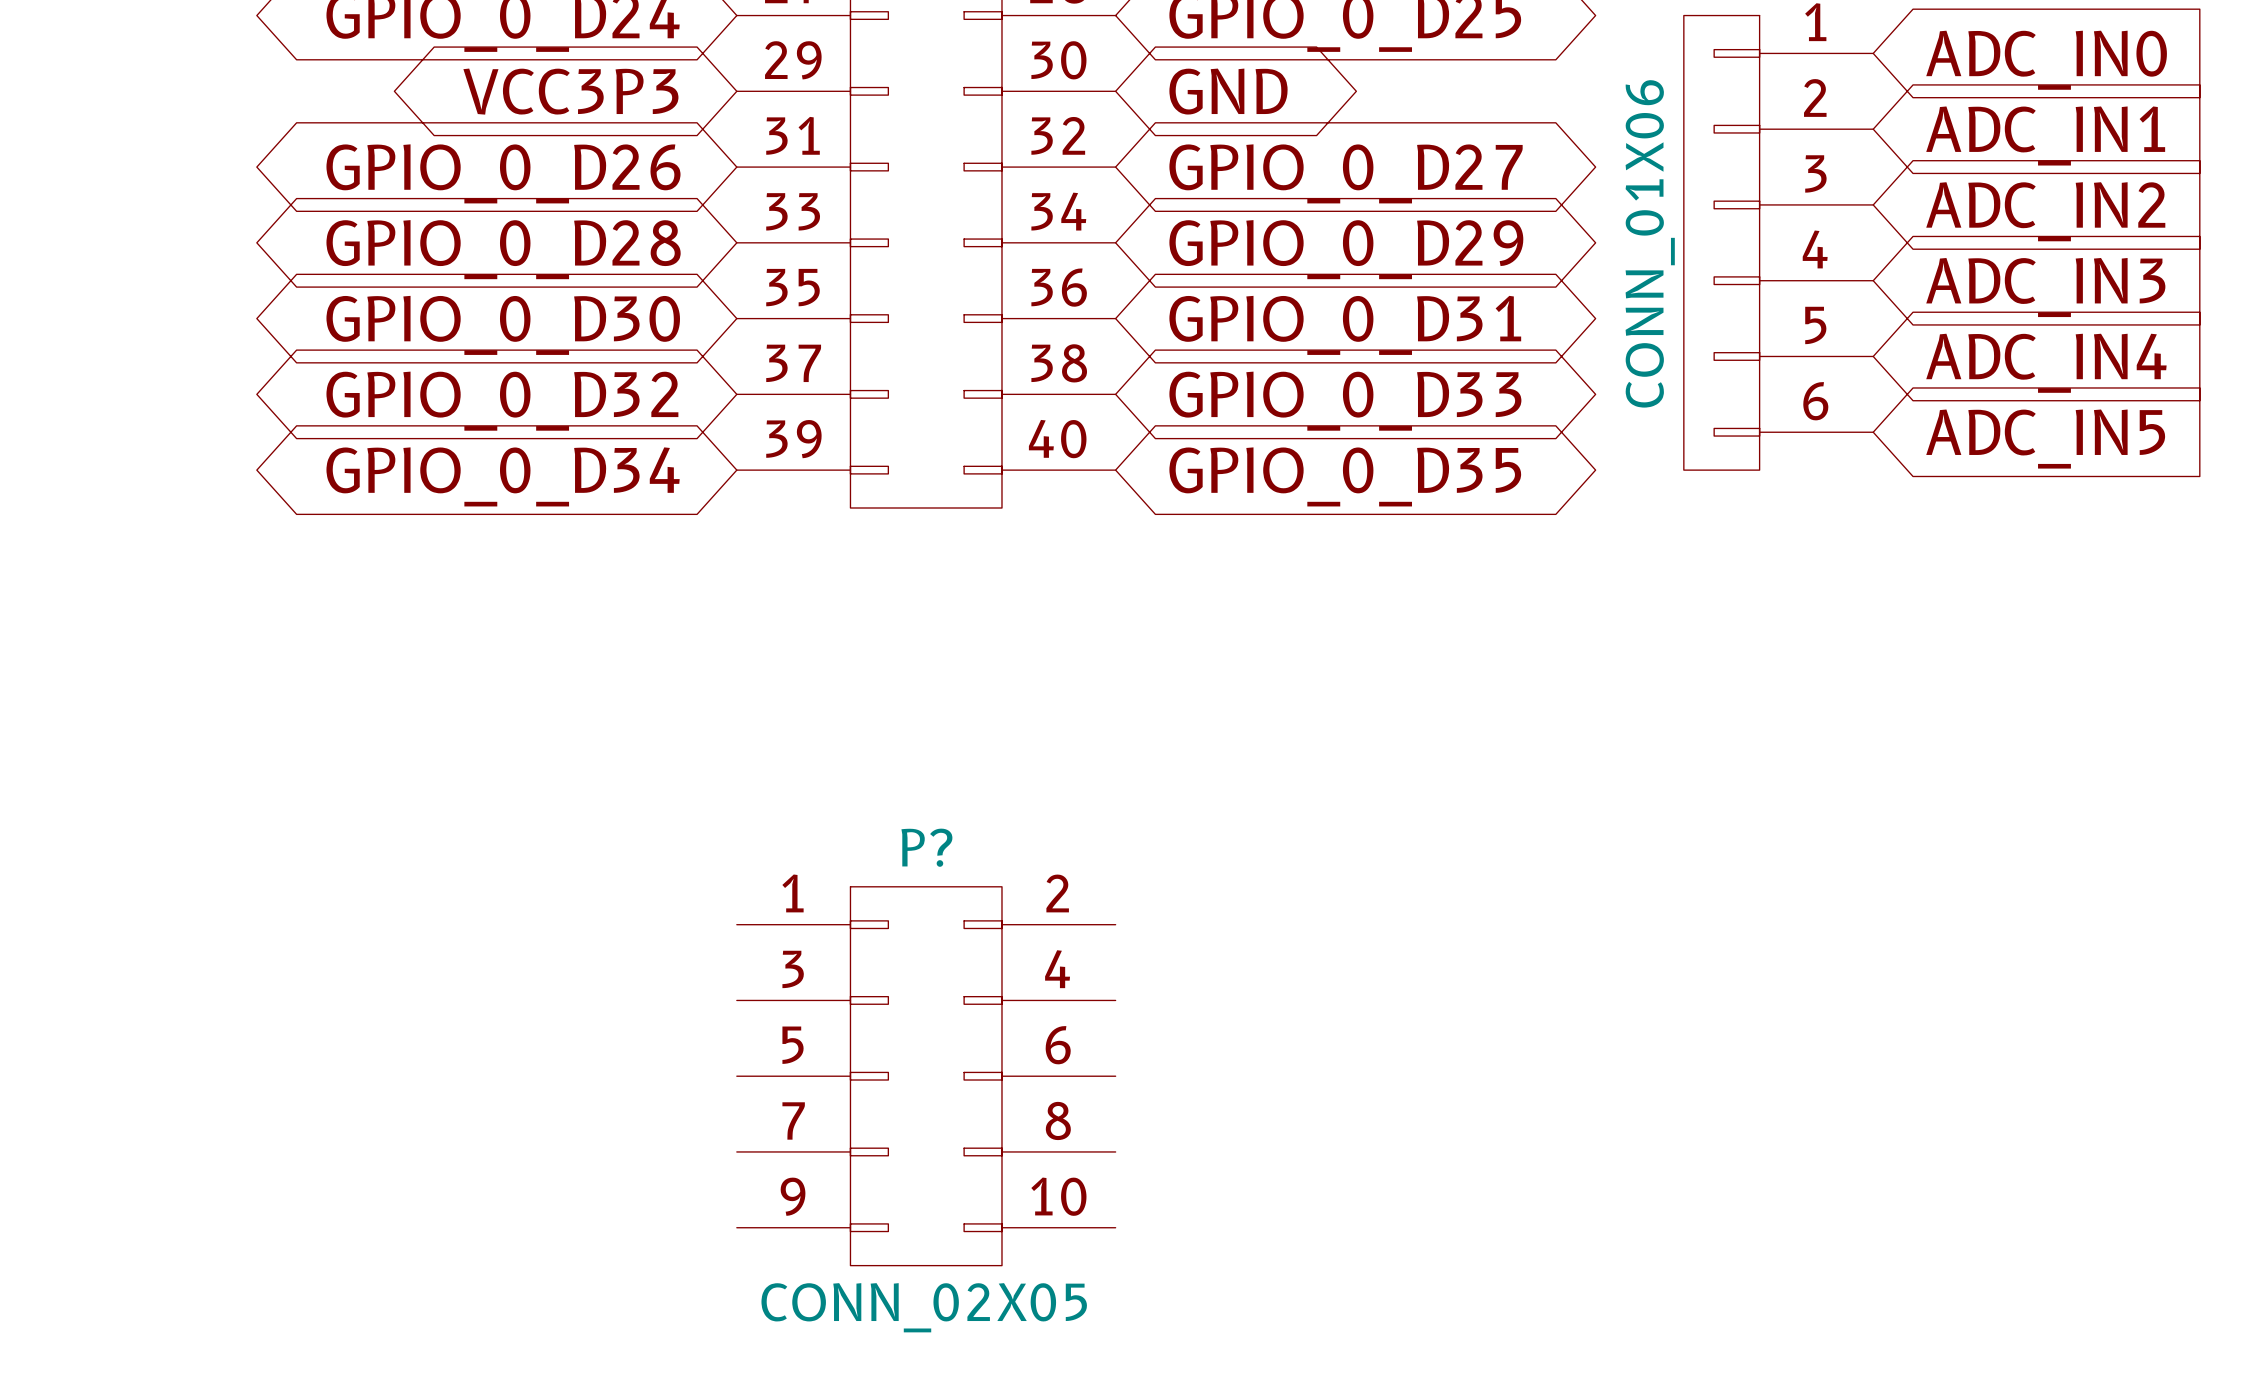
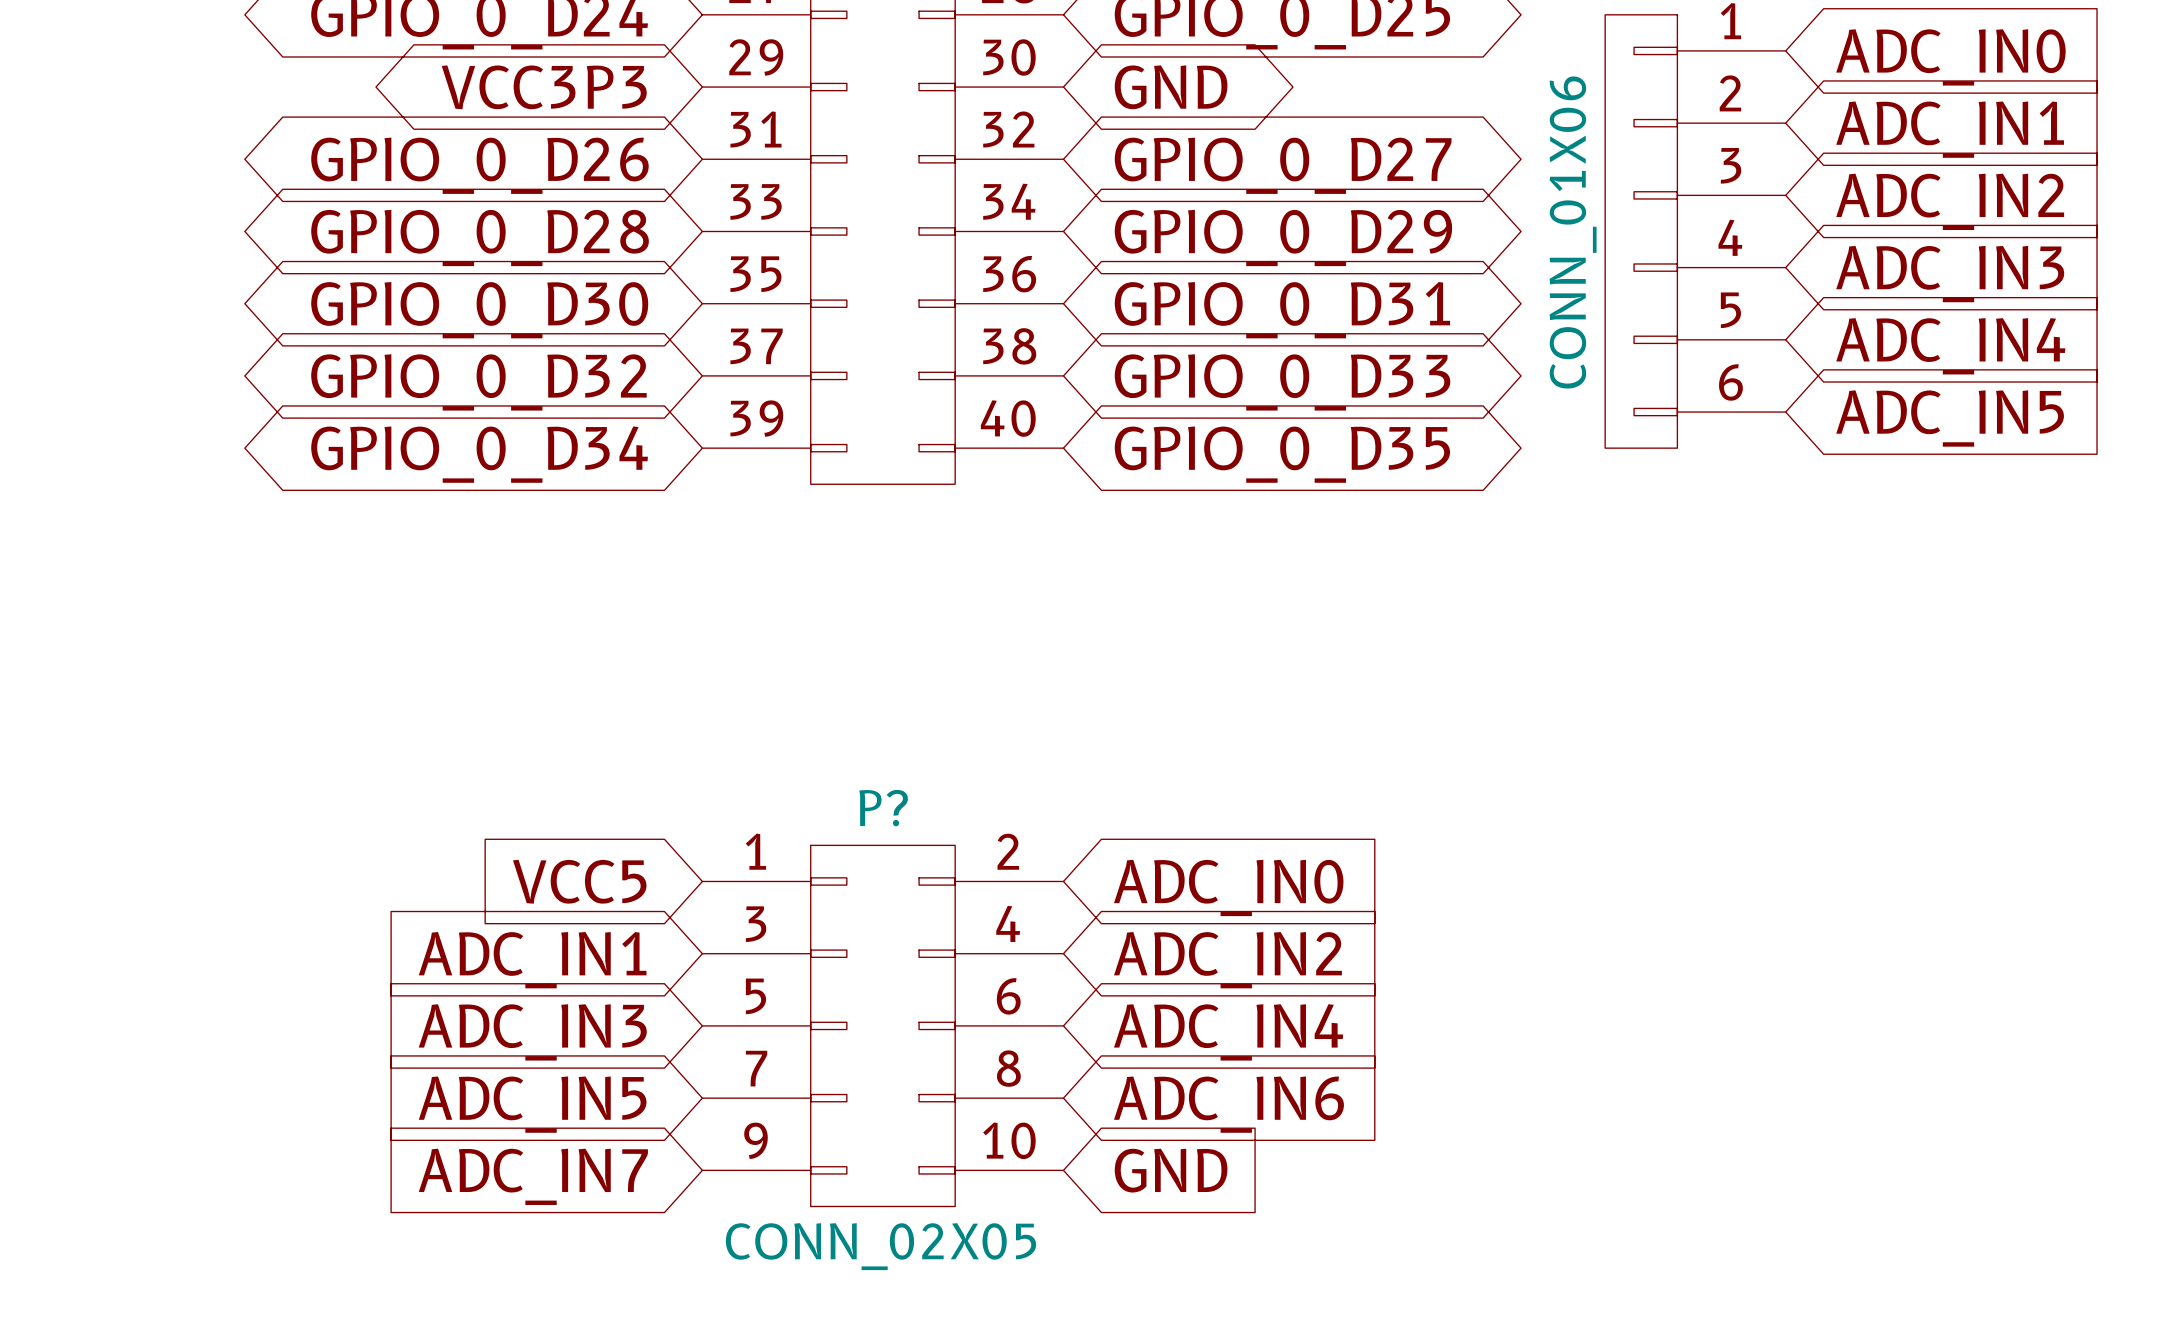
global label: none -> VCC5 (579, 881)
global label: none -> ADC_IN0 (1228, 887)
global label: none -> ADC_IN1 (532, 960)
global label: none -> ADC_IN2 (1227, 960)
global label: none -> ADC_IN3 (532, 1032)
global label: none -> ADC_IN4 (1228, 1032)
global label: none -> ADC_IN5 (532, 1104)
global label: none -> ADC_IN6 (1228, 1104)
global label: none -> GND (1171, 1170)
global label: none -> ADC_IN7 (533, 1176)

